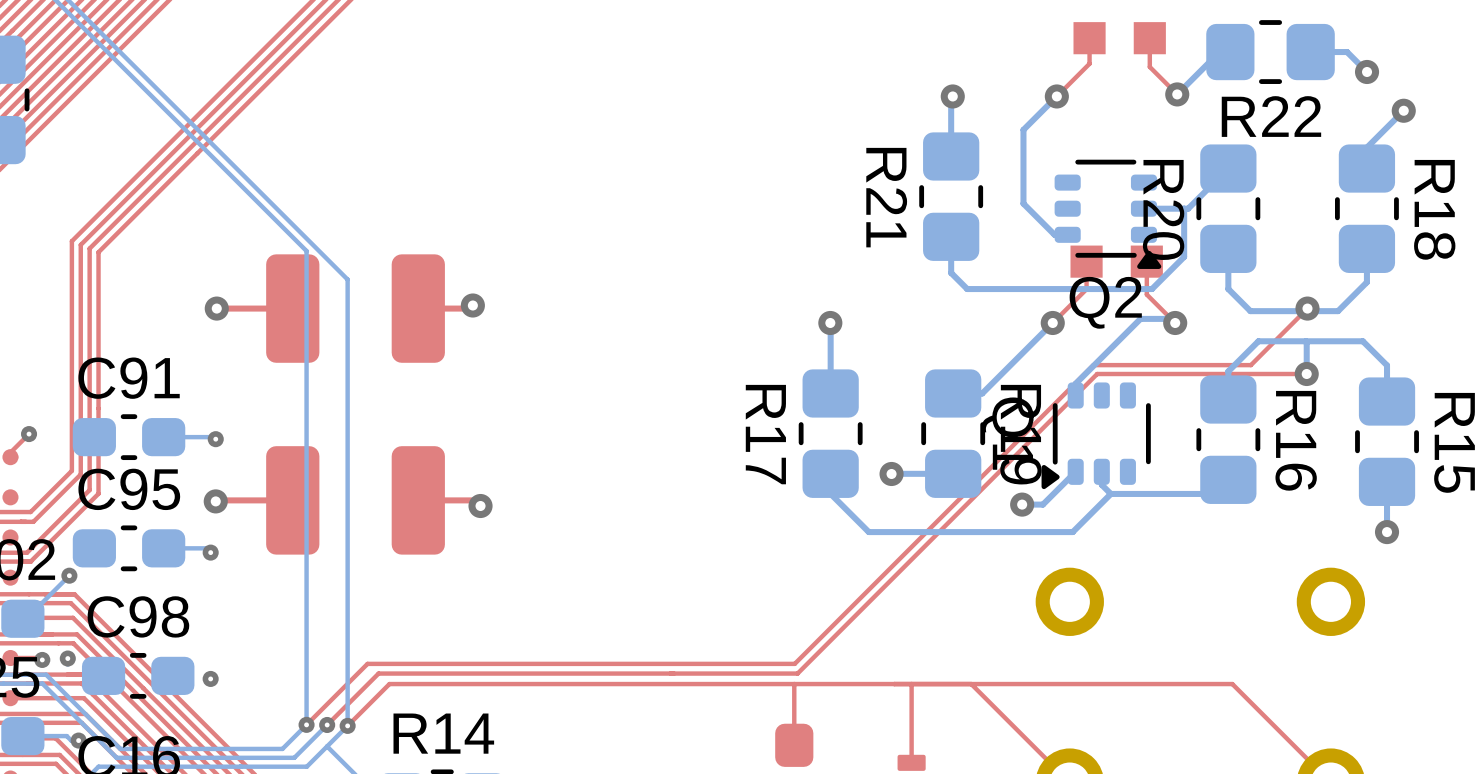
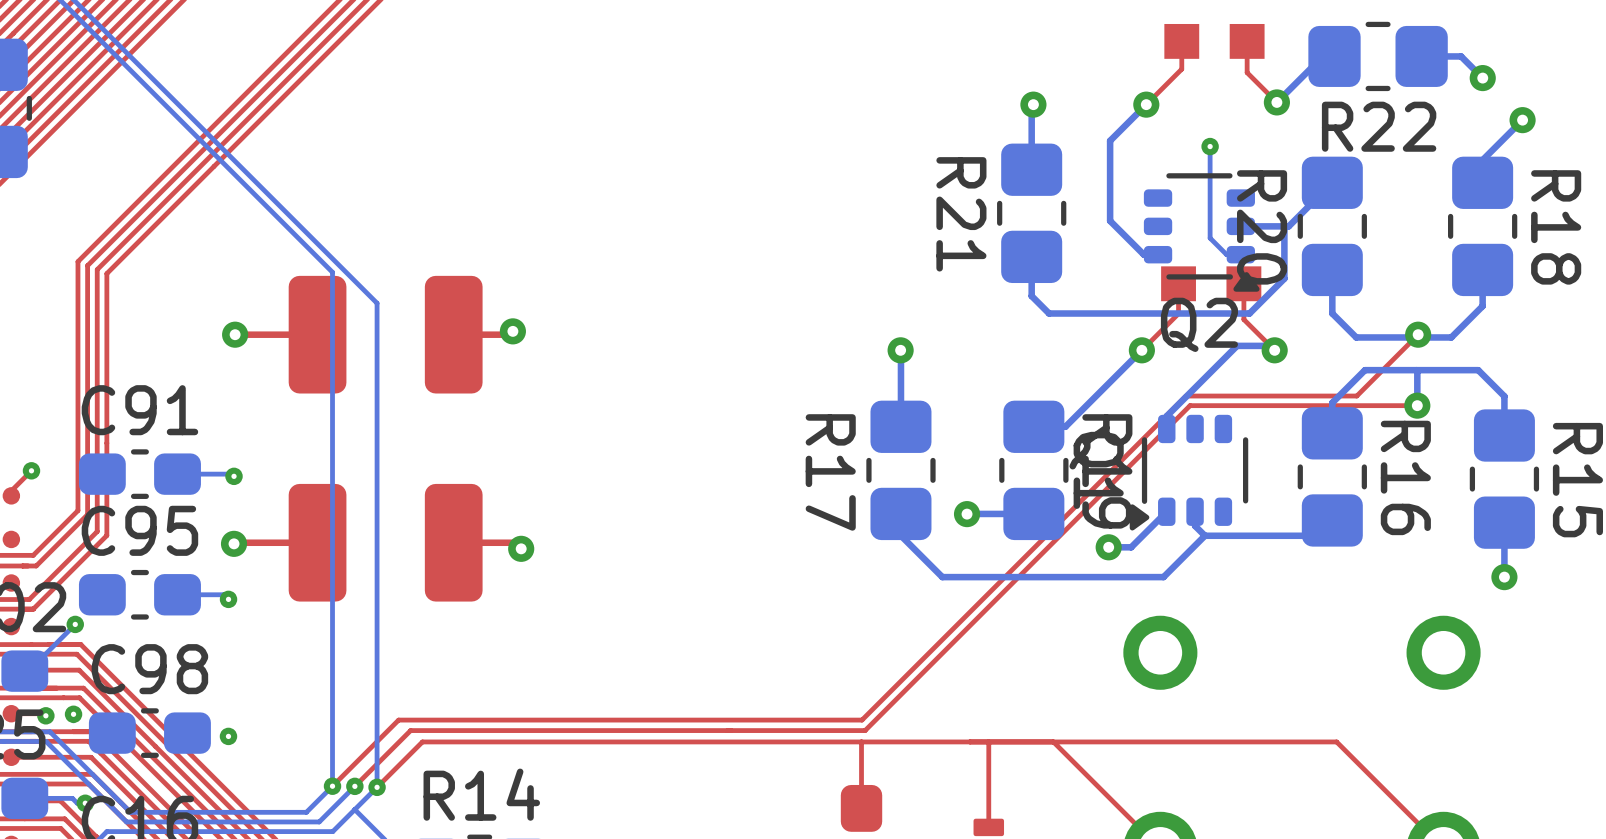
bottom track: none -> (1210, 146) (1210, 238) (1226, 254) (1240, 254)
via: none -> (1210, 146)

